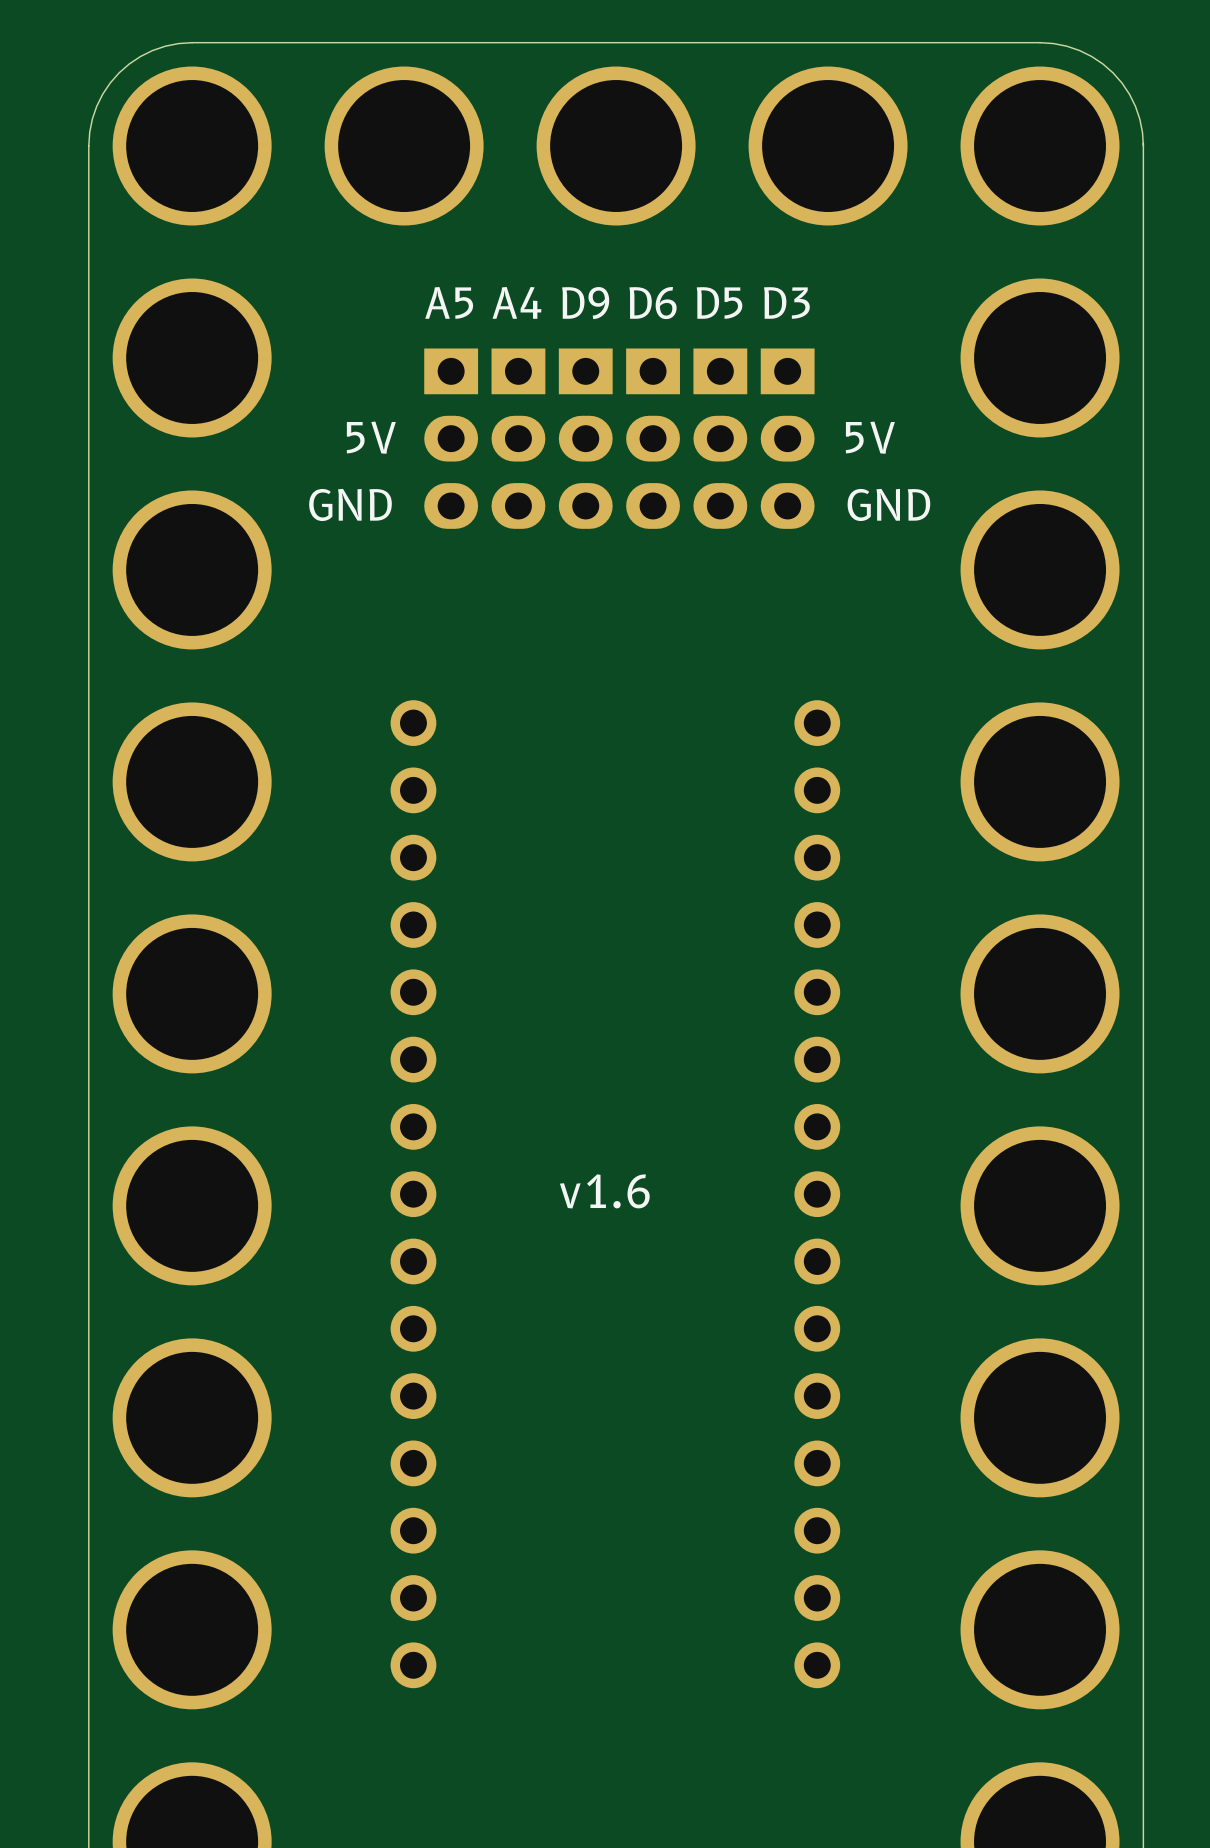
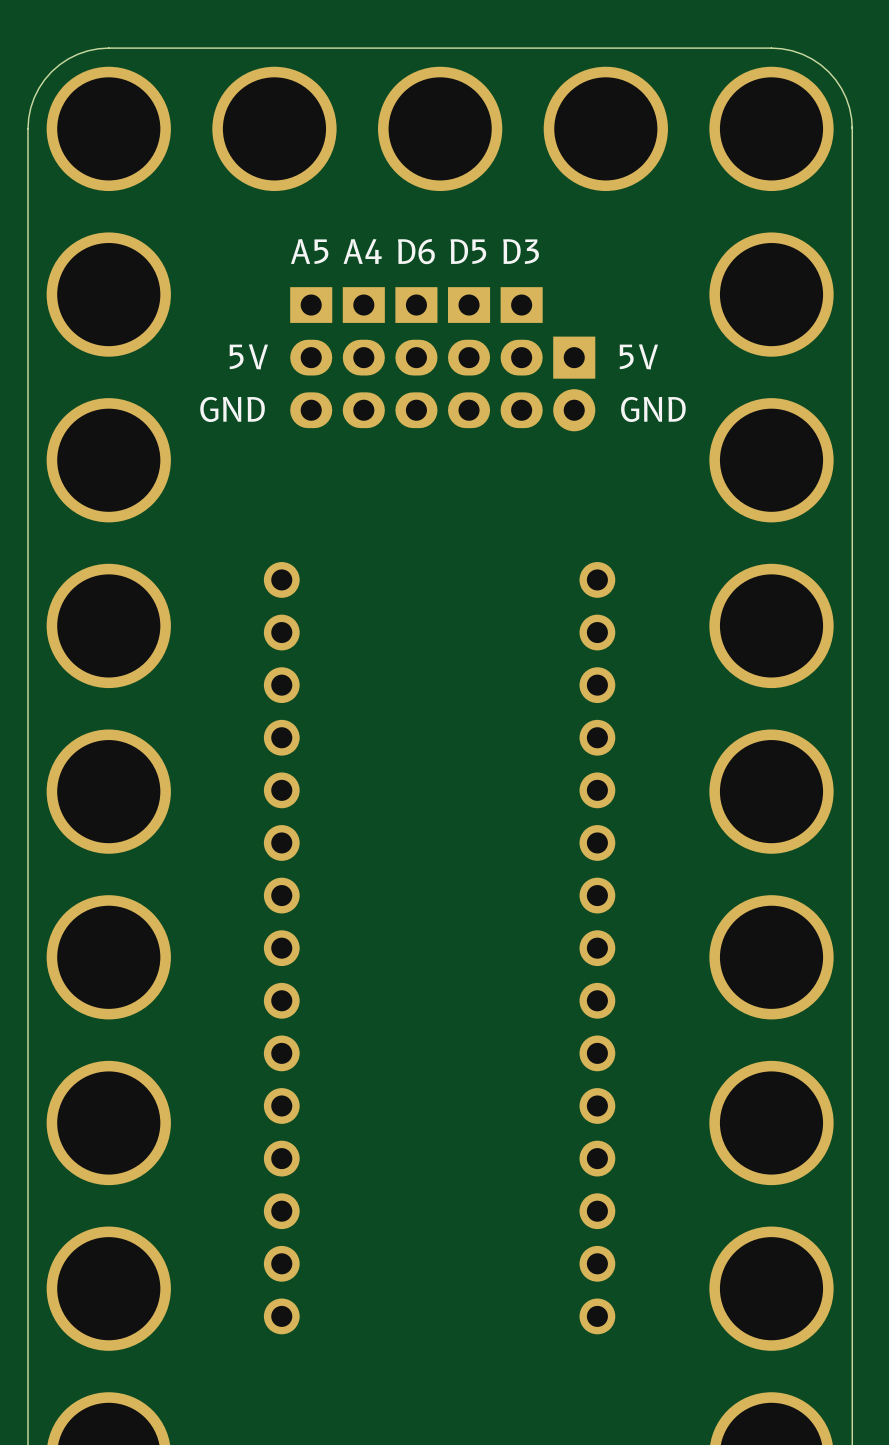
text: D5 (719, 302) -> D3 (521, 251)
text: D3 (786, 302) -> none
text: D9 (585, 303) -> D6 (416, 251)
text: D6 (653, 303) -> D5 (468, 251)
part: (787, 438) -> none
part: none -> (574, 383)
text: v1.6 (604, 1191) -> none

